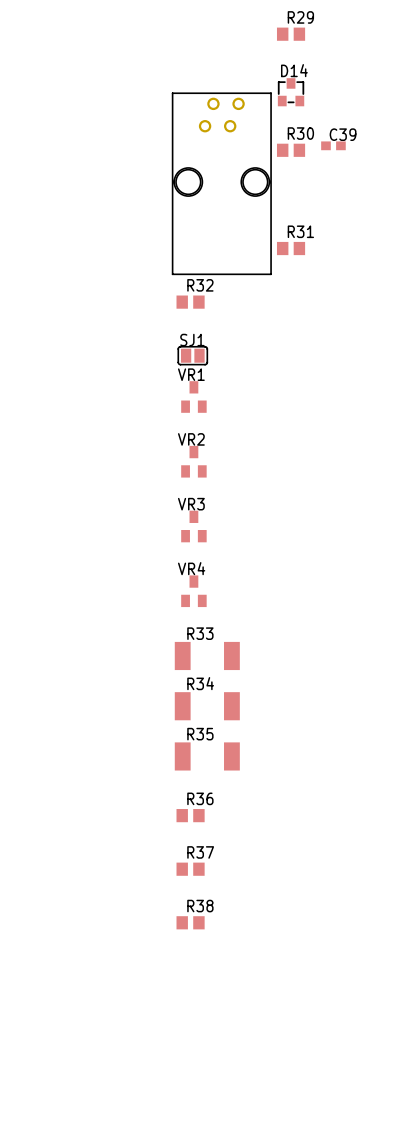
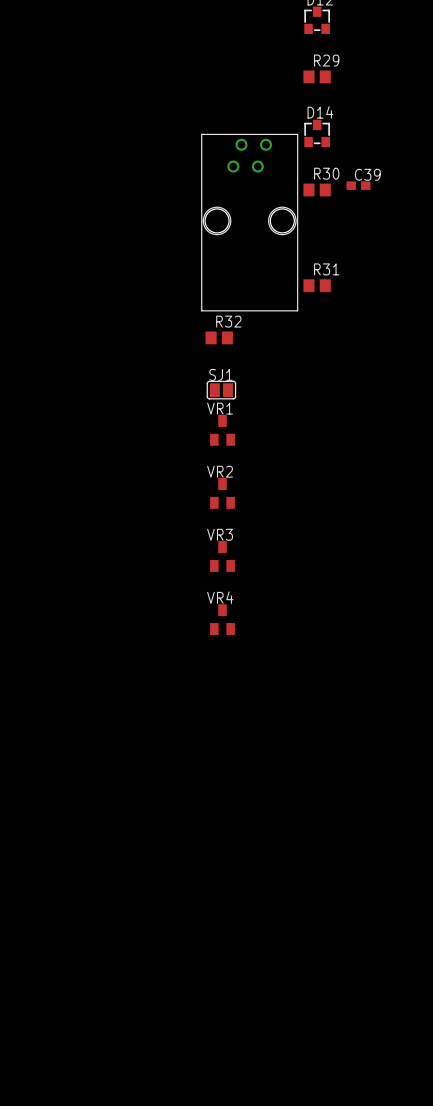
R33: (207, 655) -> none
R34: (207, 706) -> none
R35: (207, 756) -> none
R36: (190, 815) -> none
R37: (190, 869) -> none
R38: (190, 922) -> none

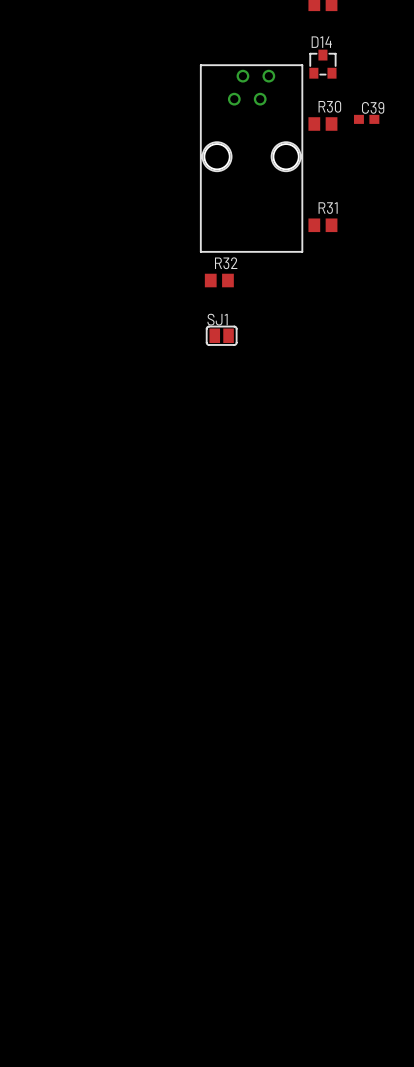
VR1: (222, 430) -> none
VR2: (222, 493) -> none
VR3: (222, 556) -> none
VR4: (222, 619) -> none

